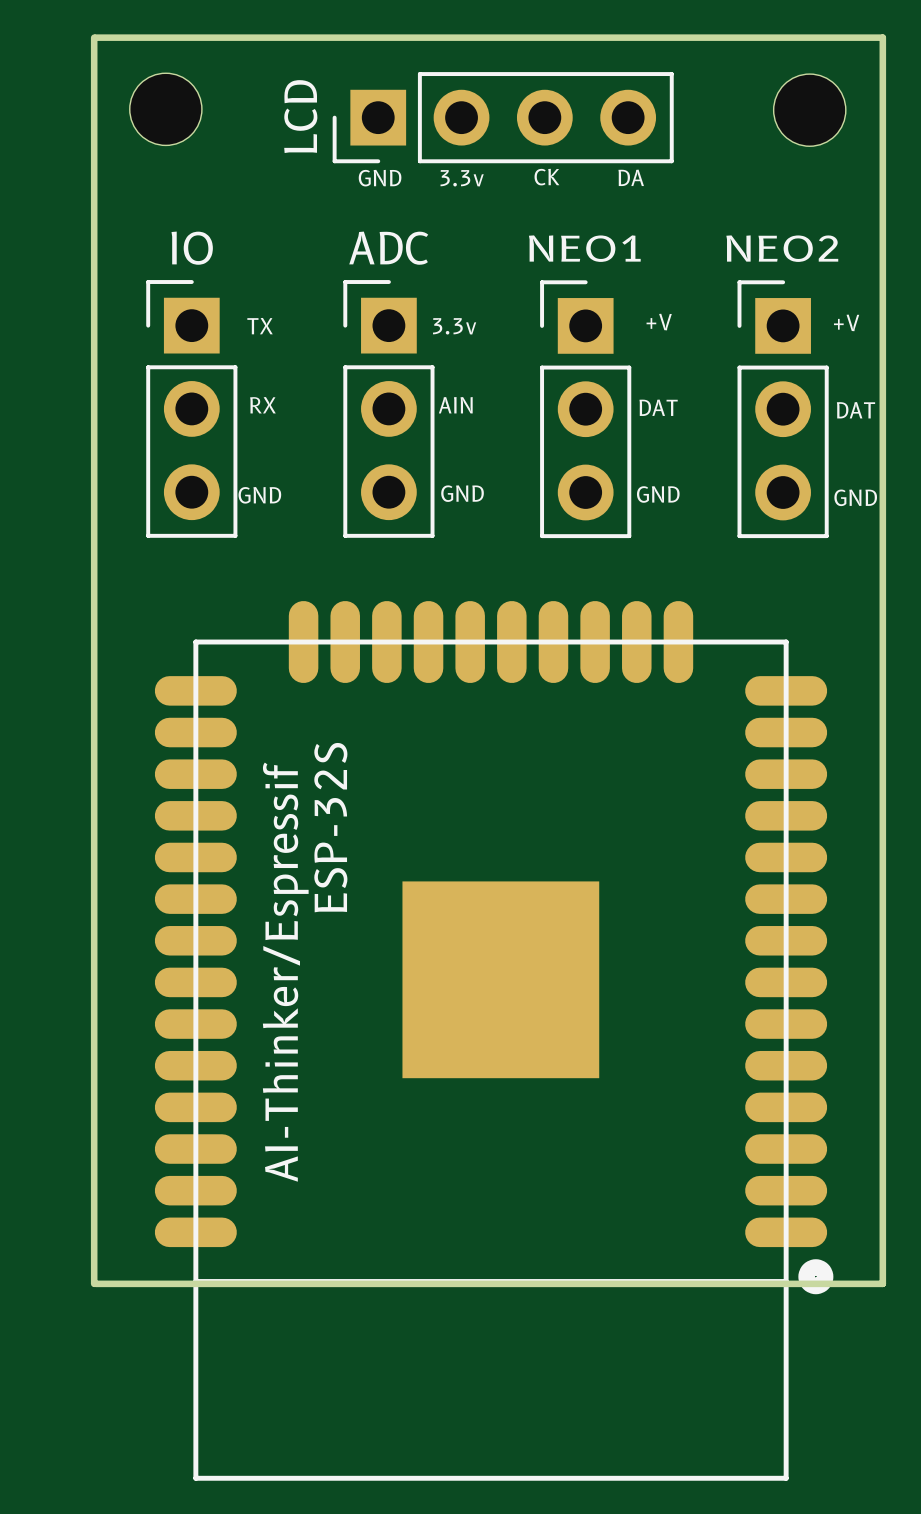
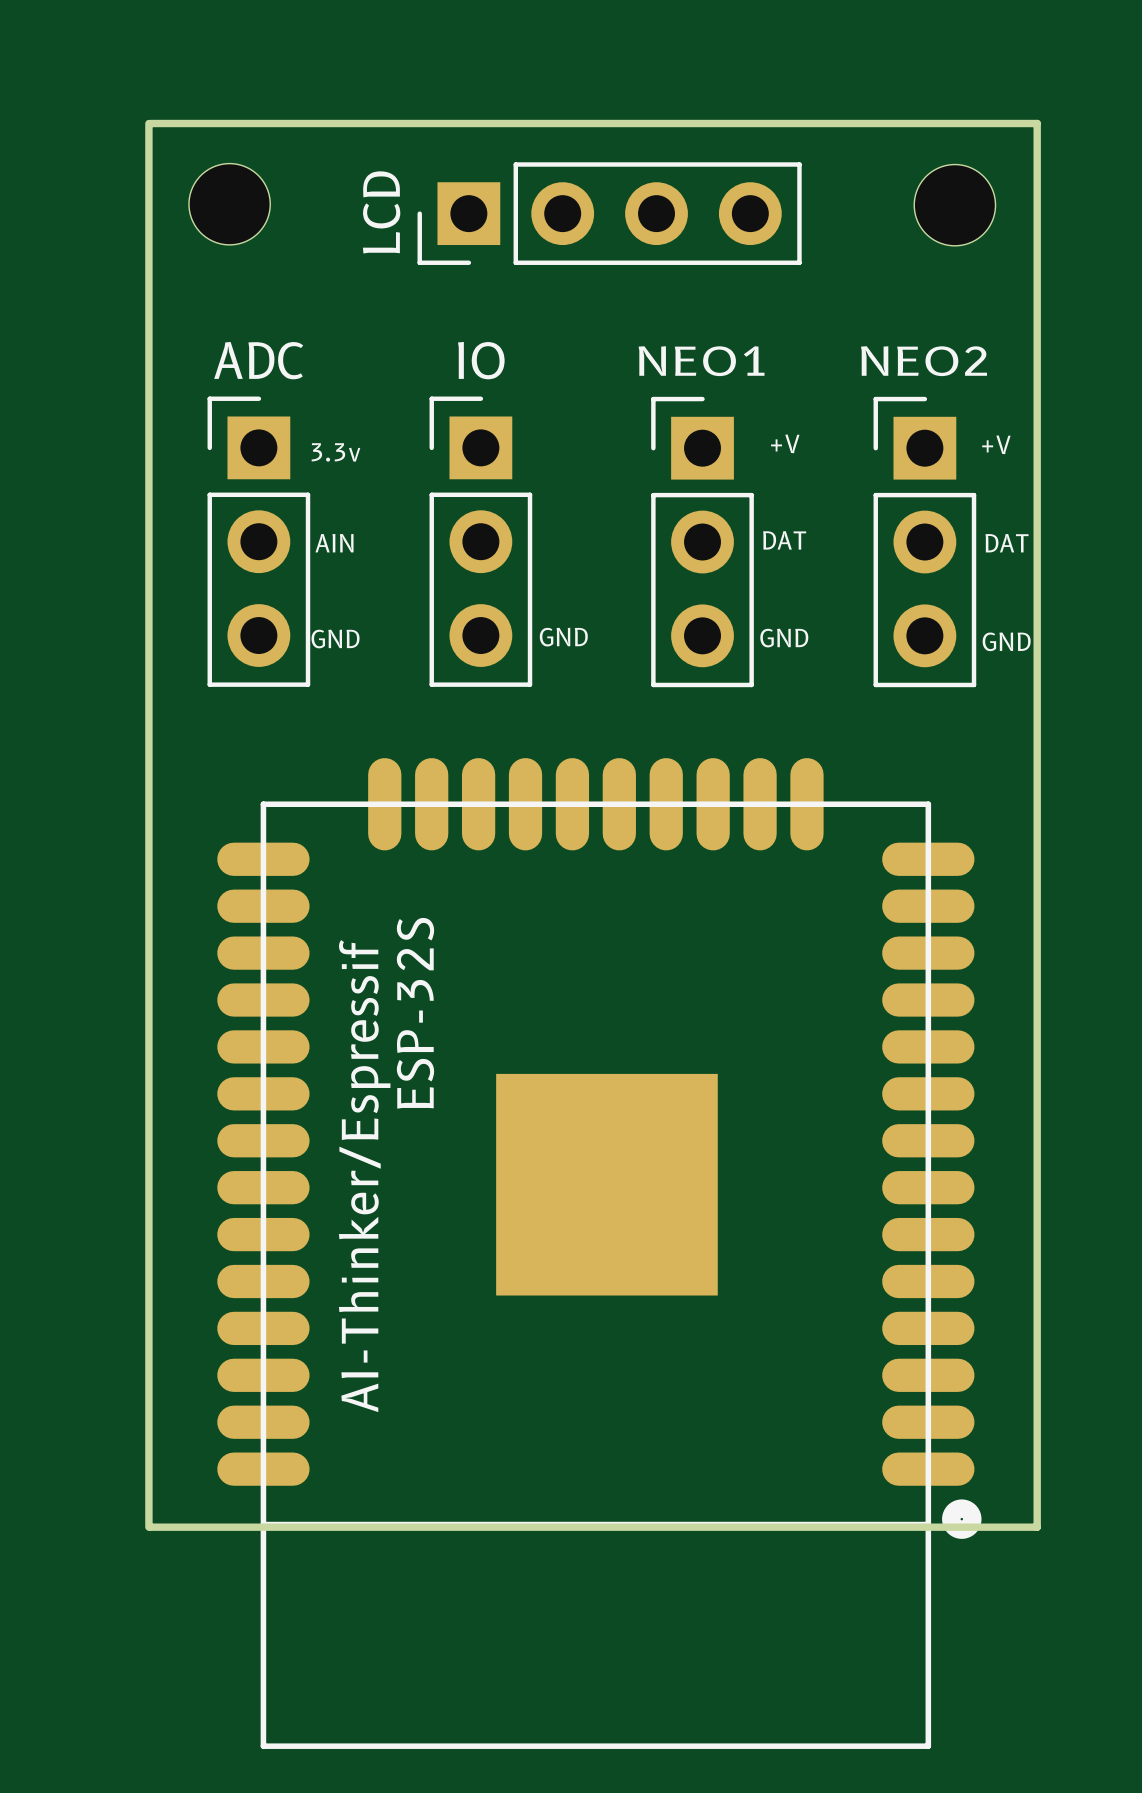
text: CK (546, 177) -> none
text: DA (631, 177) -> none
text: GND (380, 178) -> none
text: 3.3v (462, 178) -> none
IO name: IO (192, 248) -> ADC (258, 360)
ADC name: ADC (388, 248) -> IO (481, 360)
text: TX (260, 326) -> 3.3v (335, 452)
text: 3.3v (454, 326) -> none
text: RX (262, 405) -> AIN (334, 543)
text: AIN (455, 405) -> none

